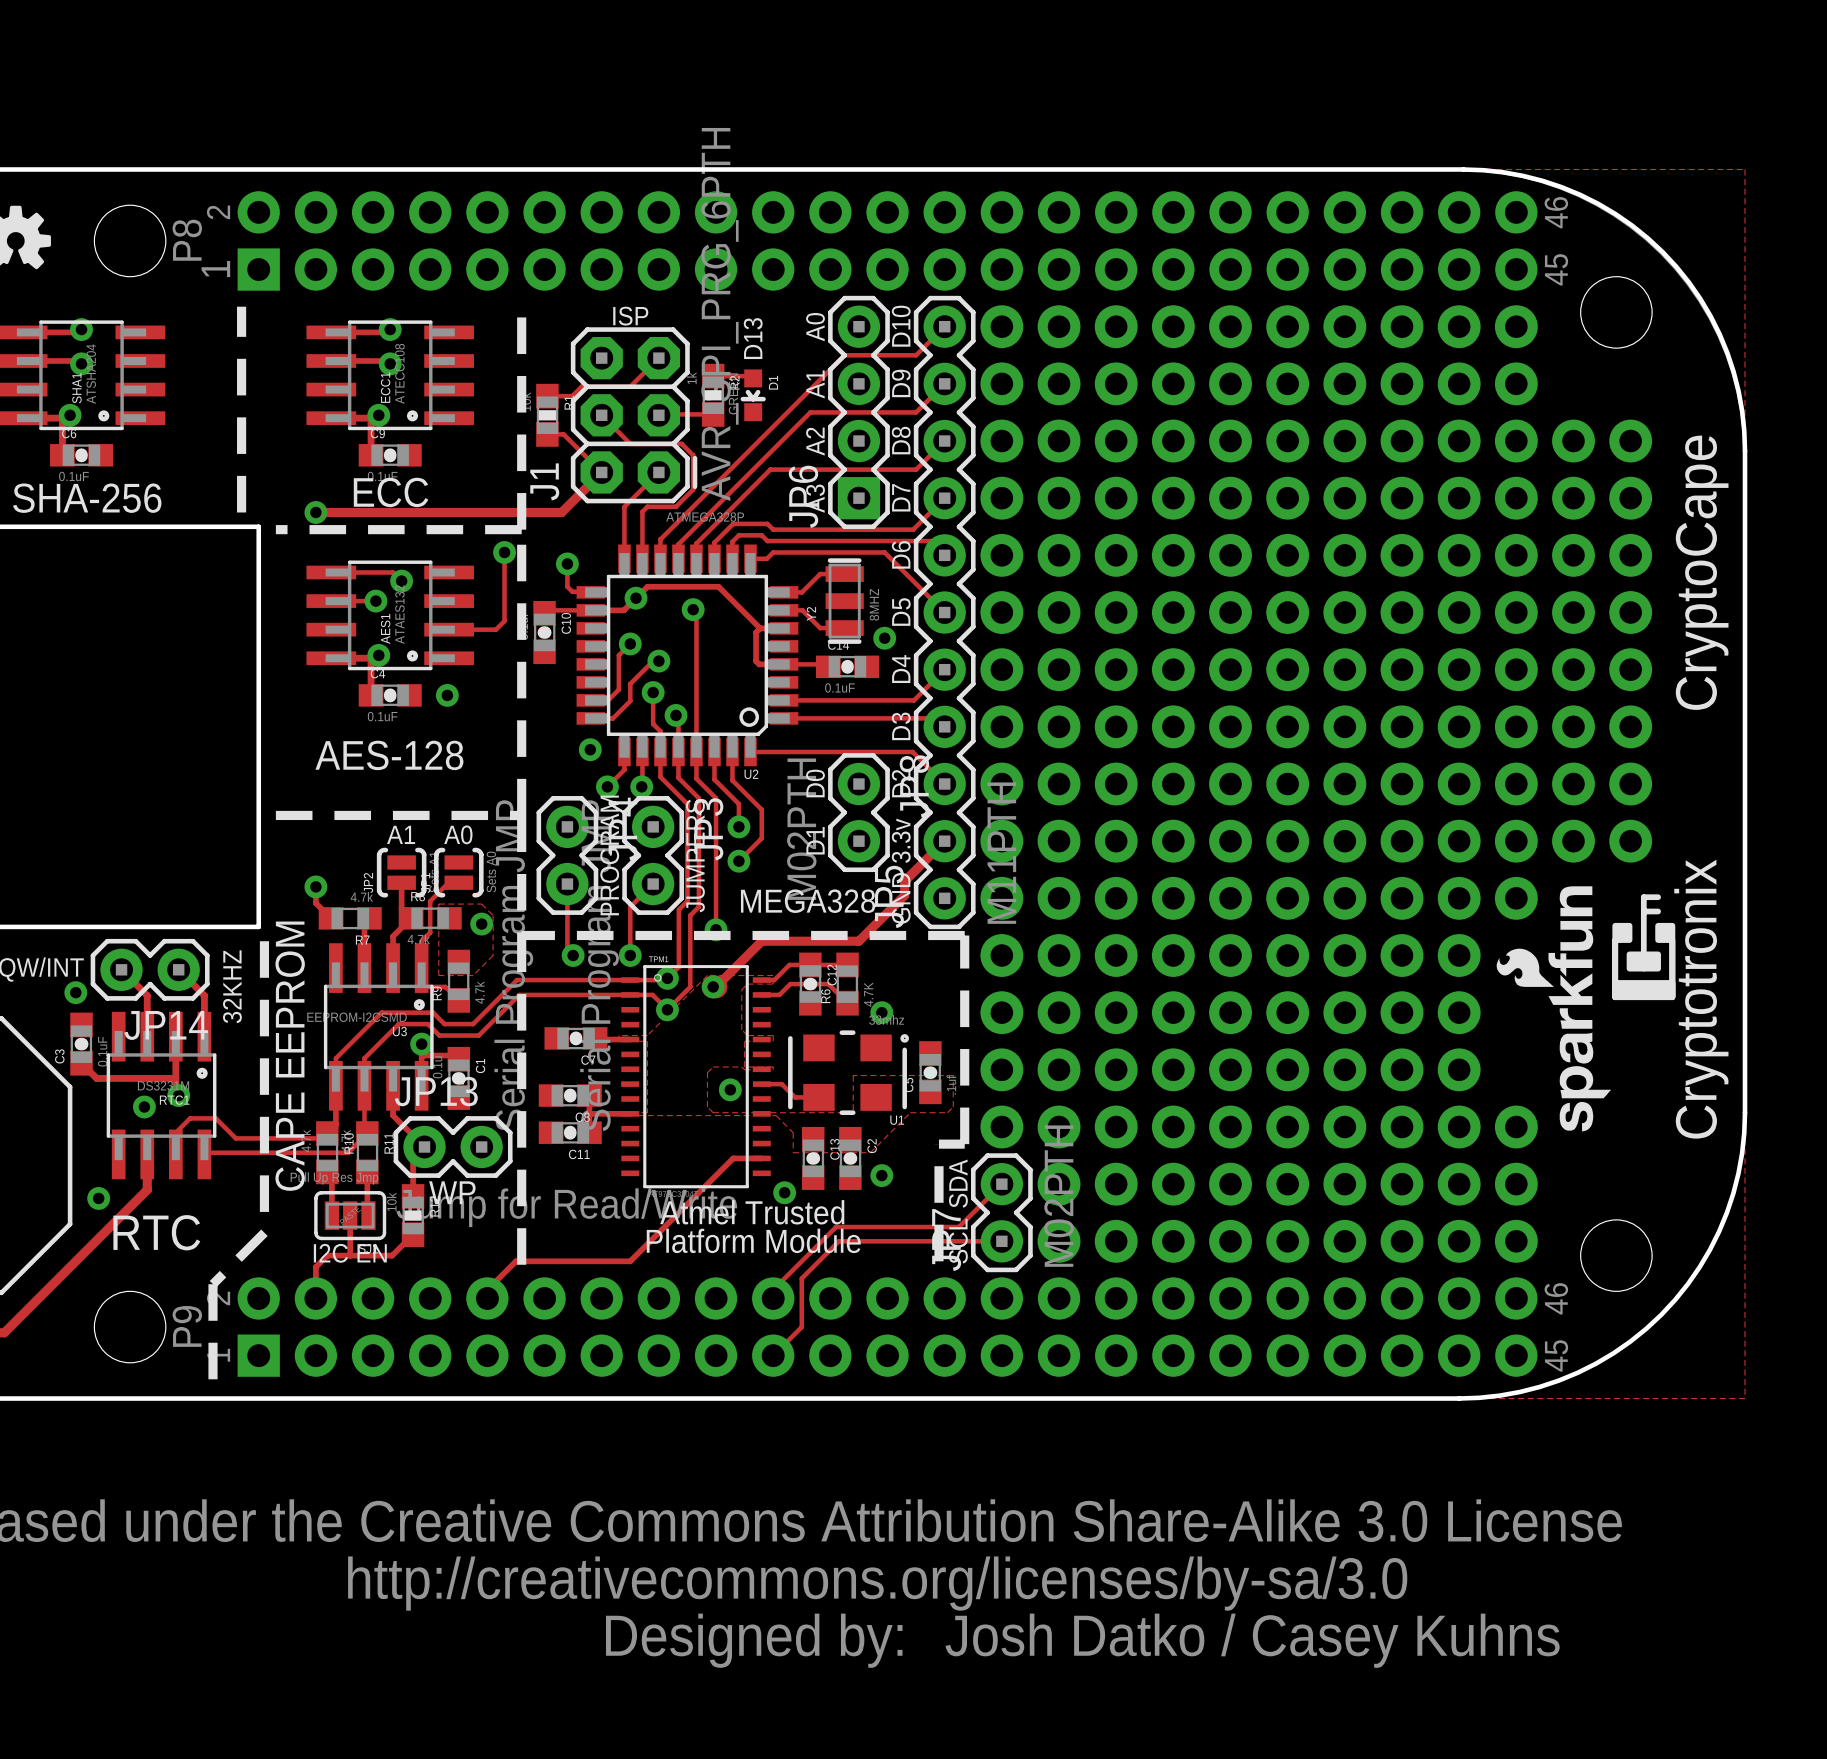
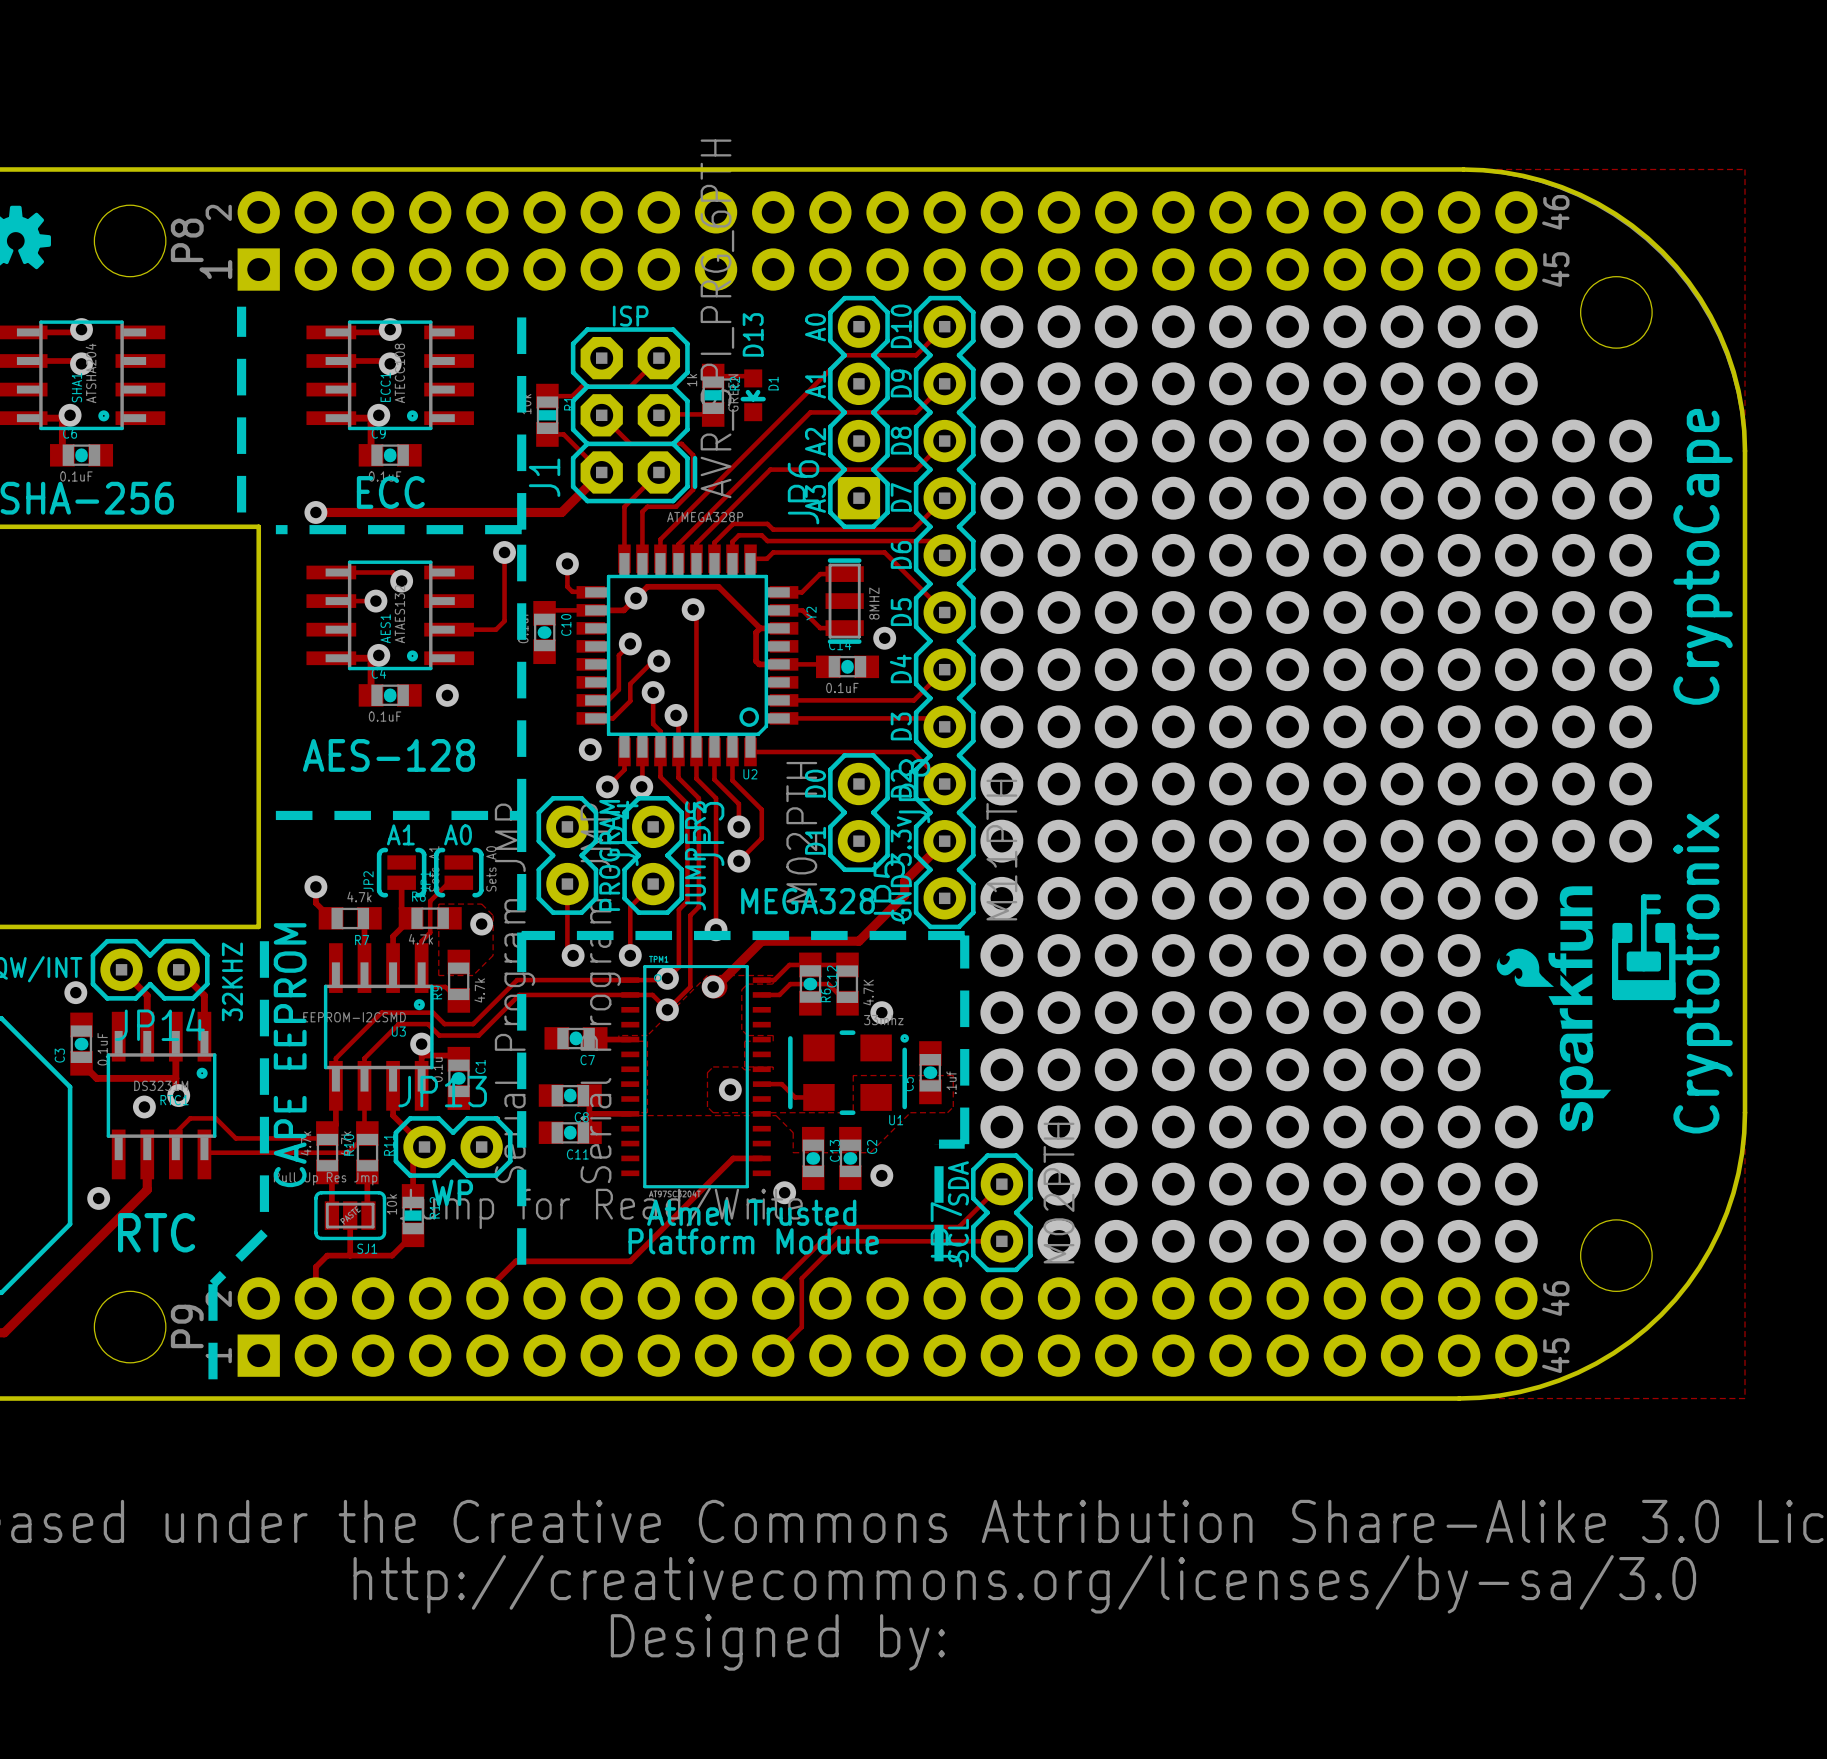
text: I2C EN (350, 1253) -> none
text: Josh Datko / Casey Kuhns (1252, 1640) -> none

